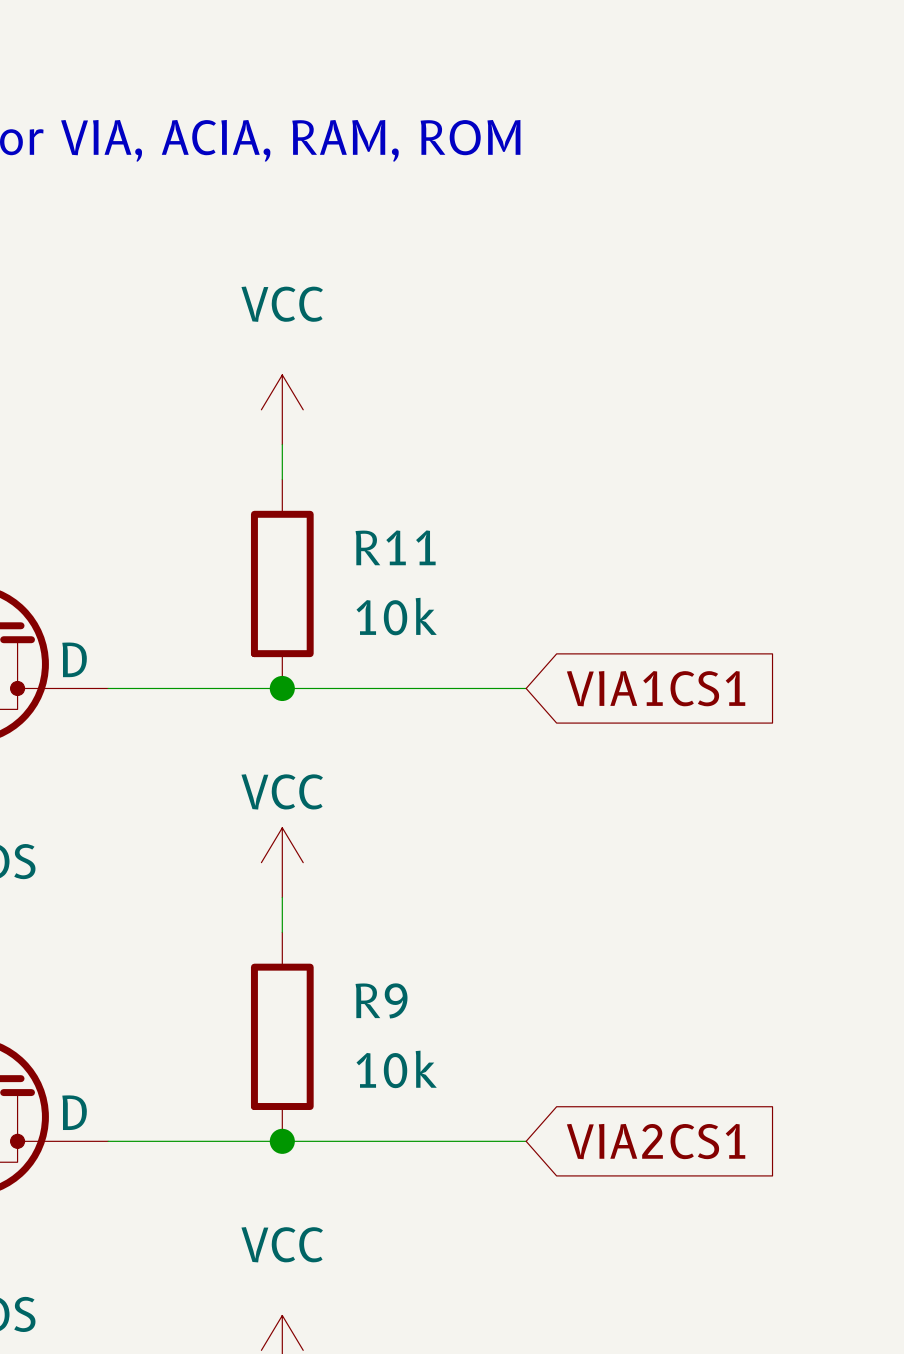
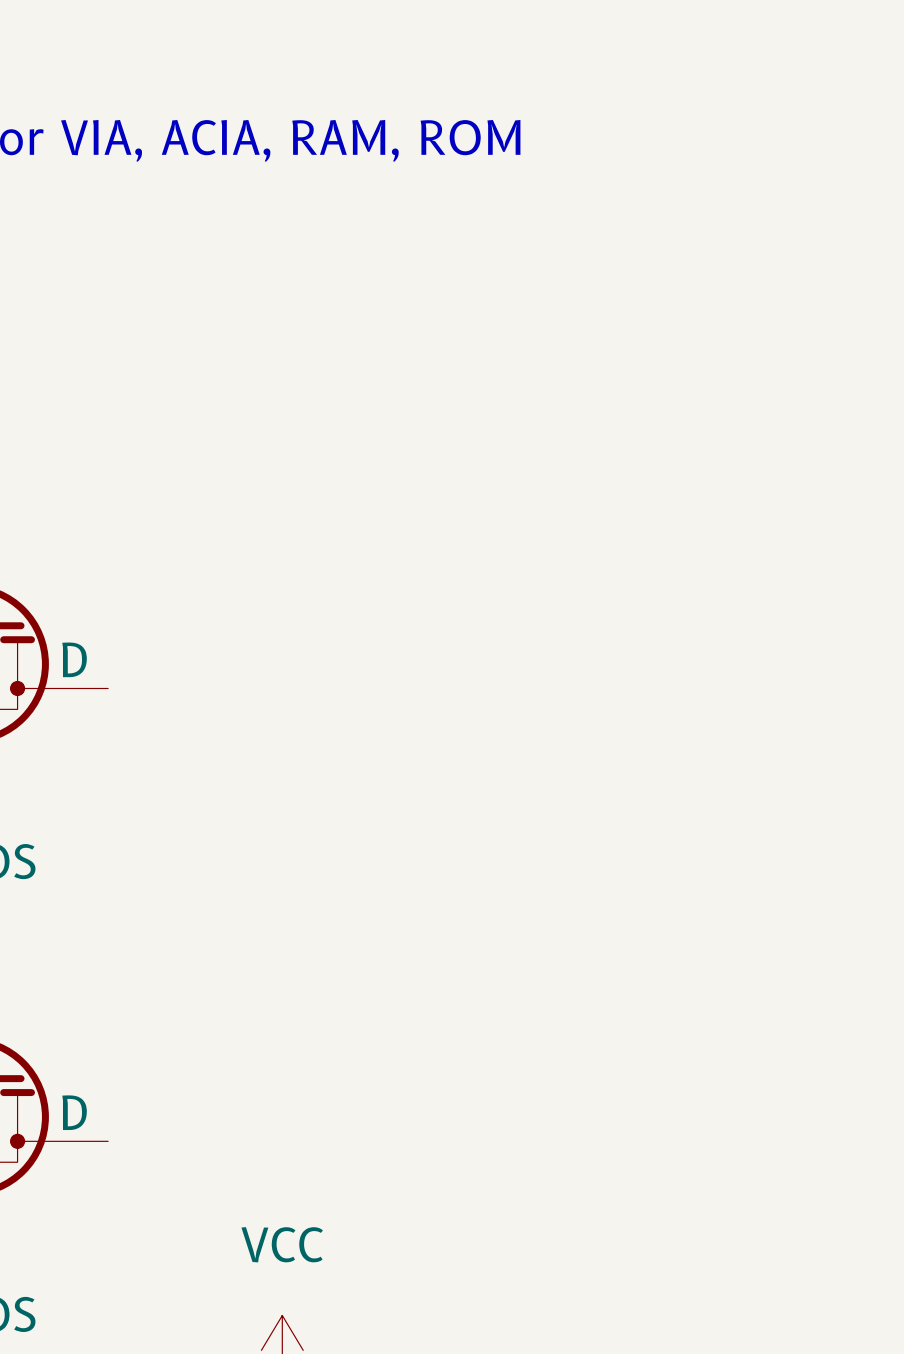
power symbol: VCC (282, 409) -> none
wire: (282, 444) (282, 479) -> none
R11: 10k (282, 583) -> none
wire: (108, 688) (526, 688) -> none
junction: (282, 688) -> none
global label: VIA1CS1 (656, 688) -> none
power symbol: VCC (282, 862) -> none
wire: (282, 897) (282, 932) -> none
R9: 10k (282, 1036) -> none
wire: (108, 1141) (526, 1141) -> none
junction: (282, 1141) -> none
global label: VIA2CS1 (656, 1141) -> none

